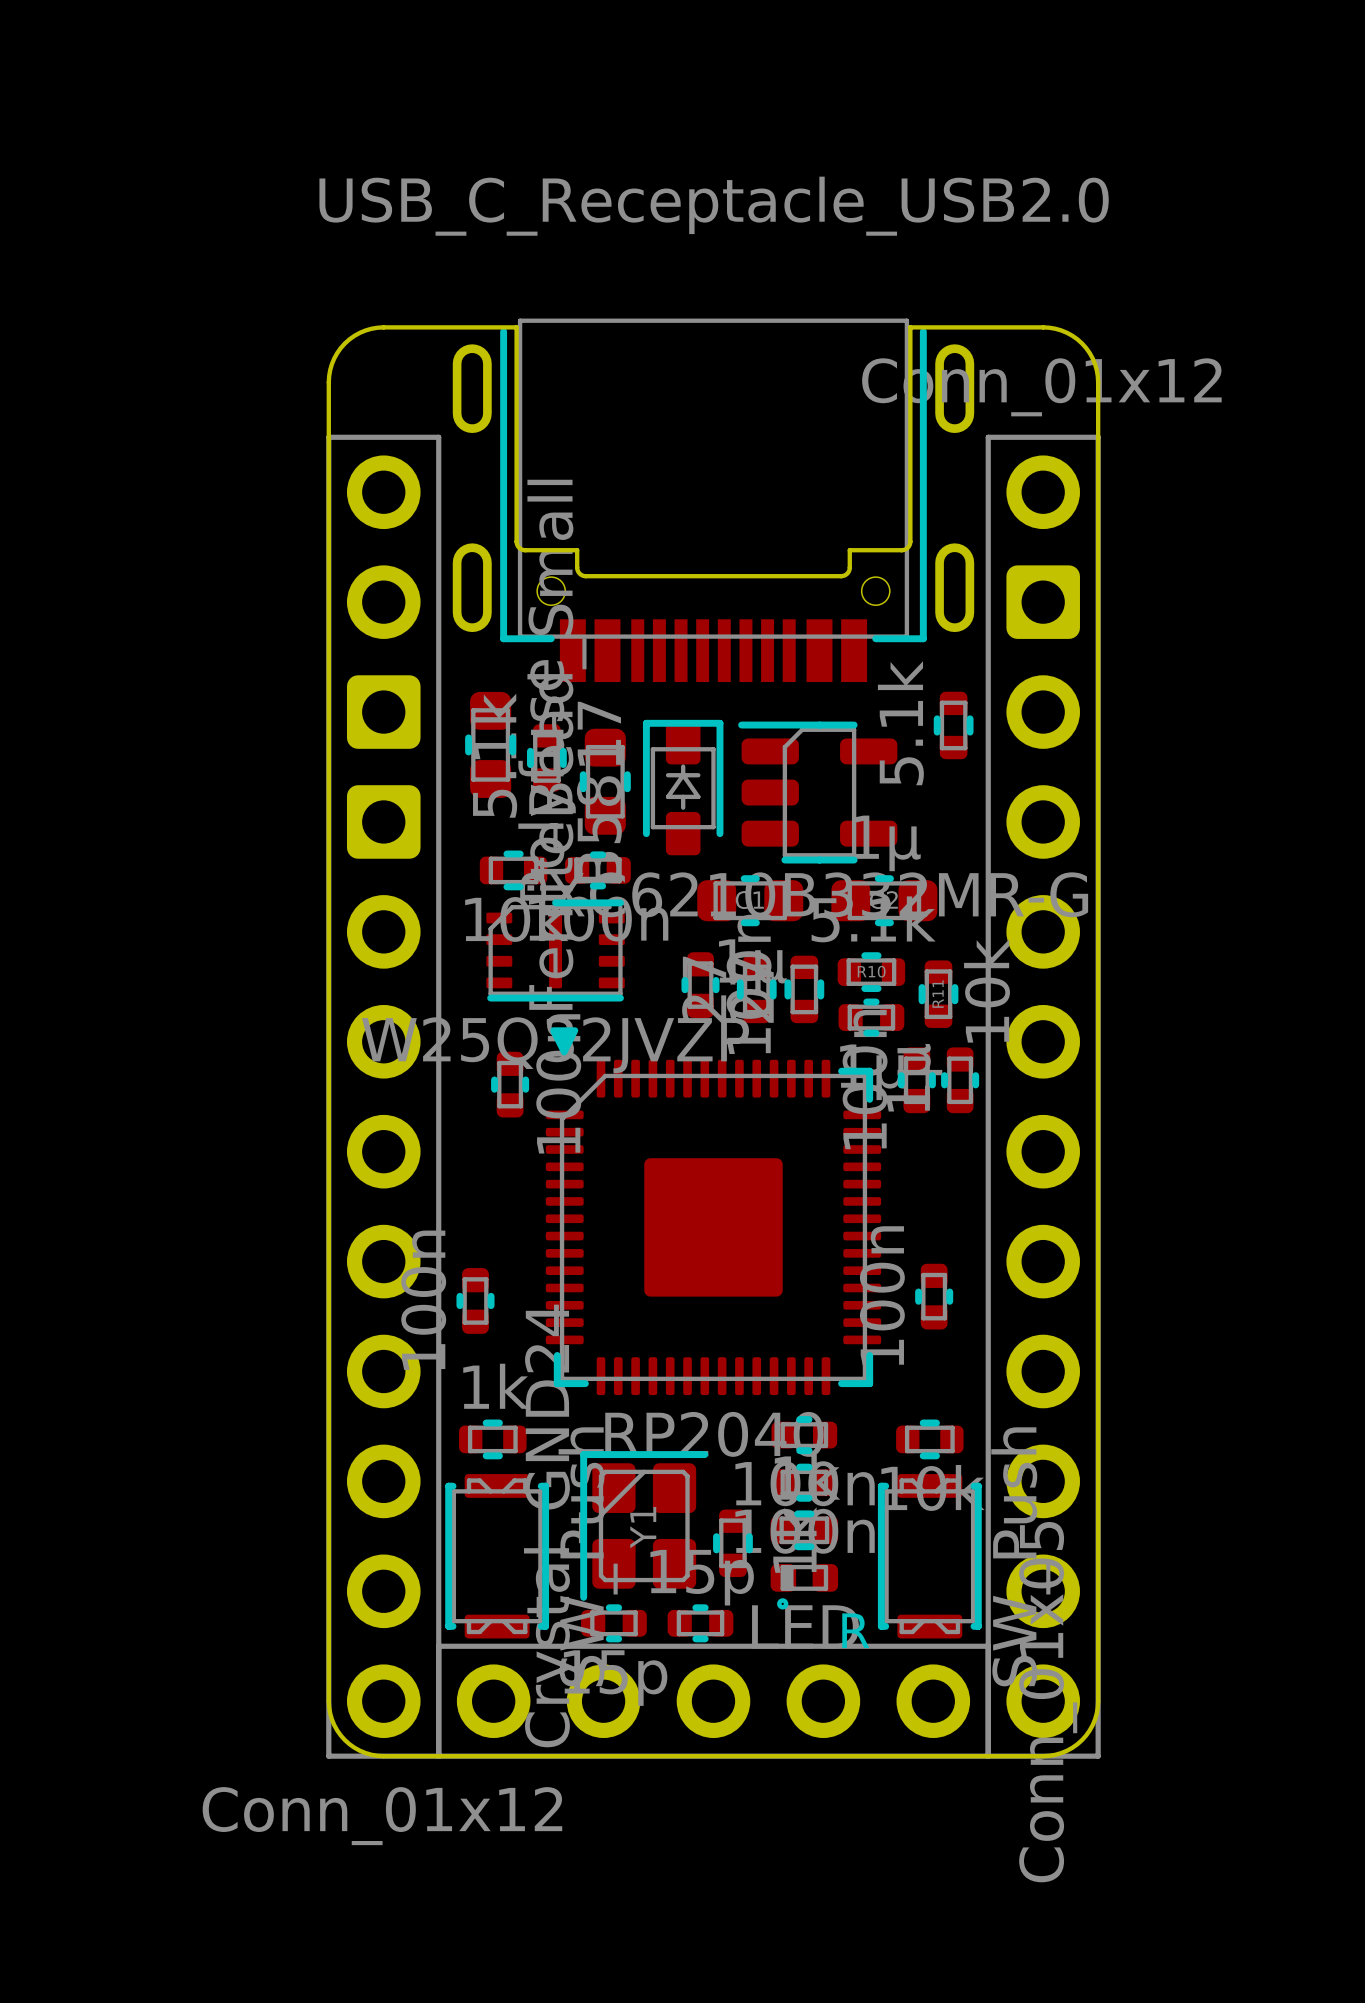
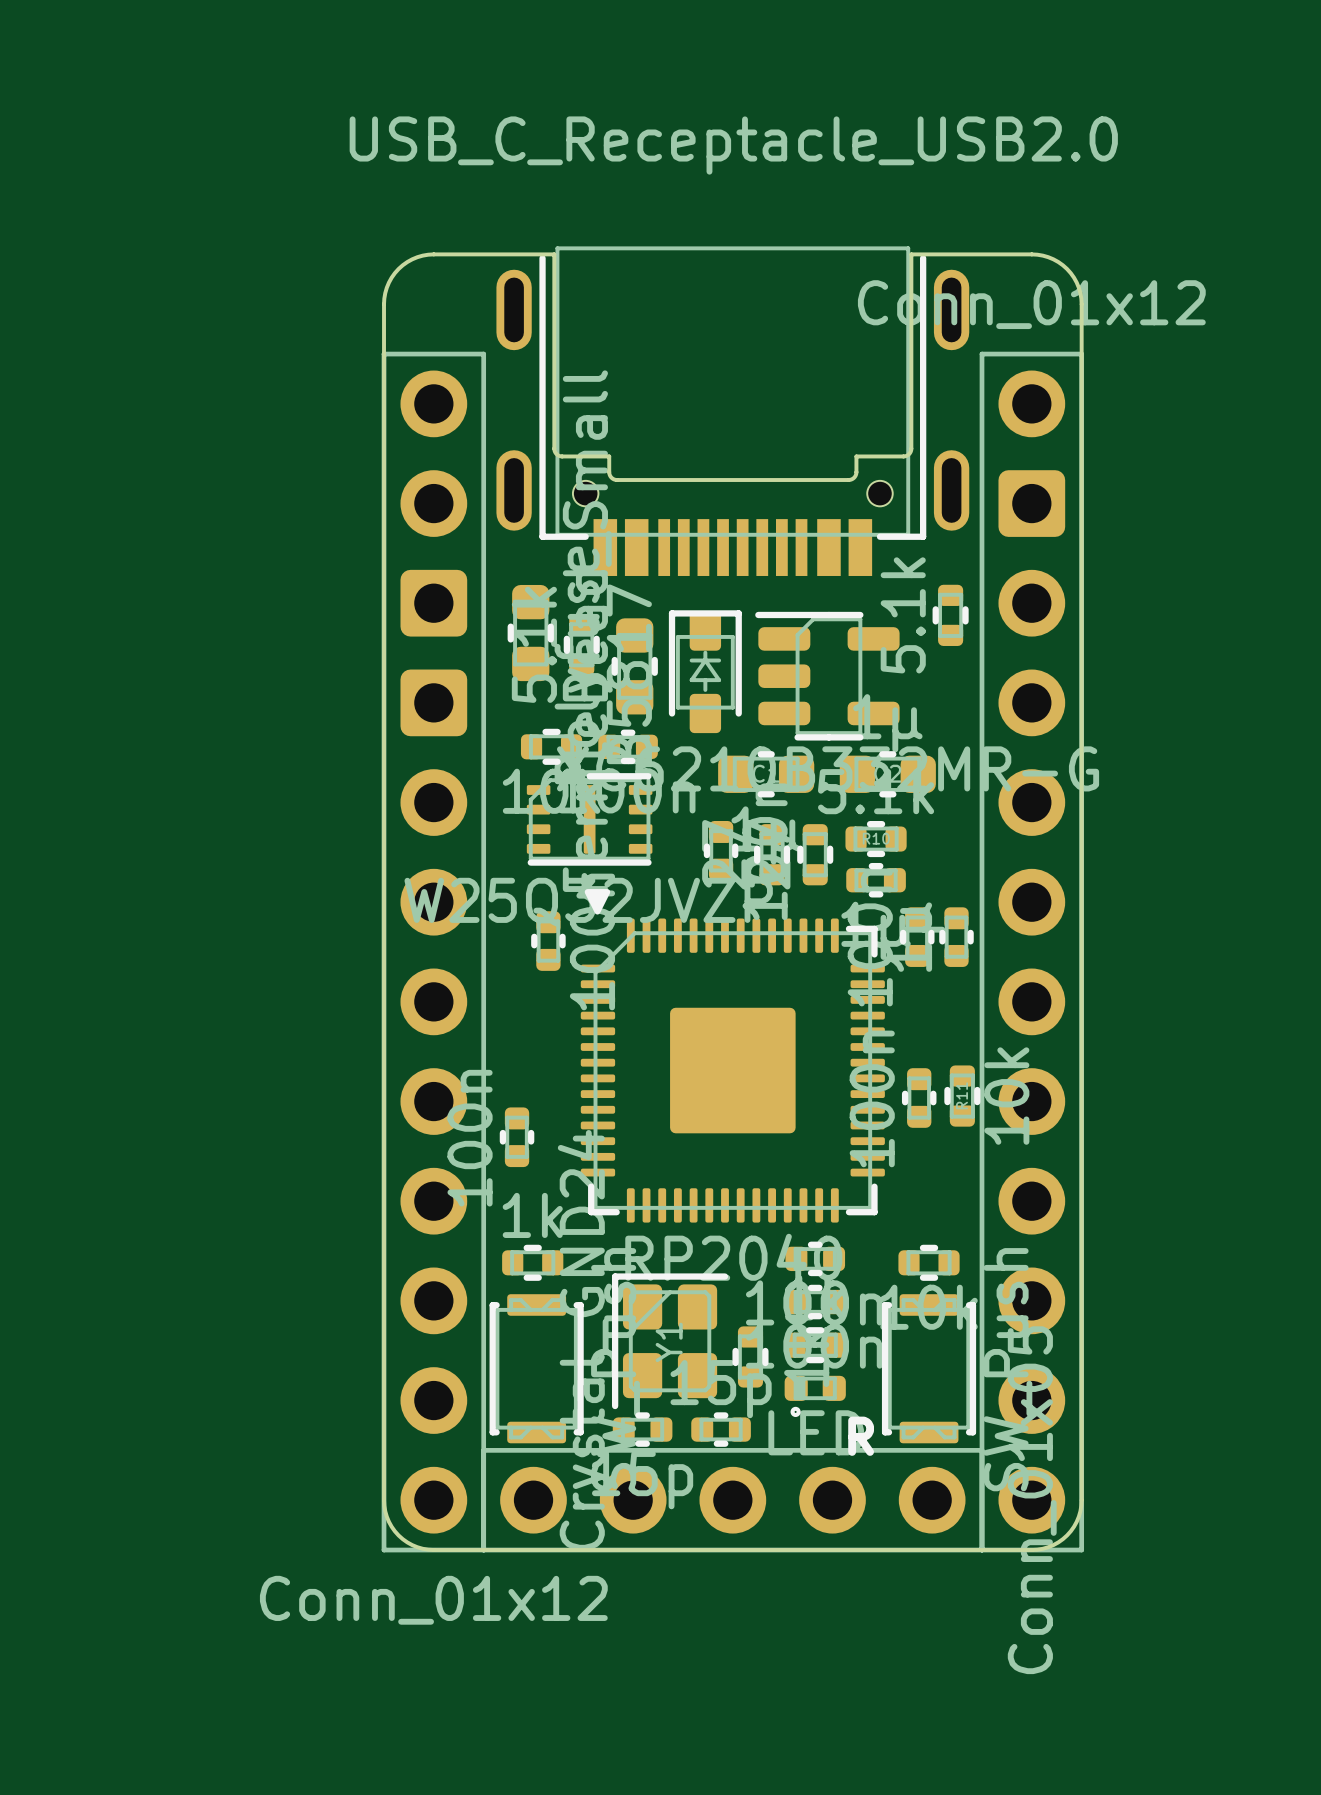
R11 position: (938, 994) -> (962, 1096)
part position: (934, 1296) -> (919, 1098)

